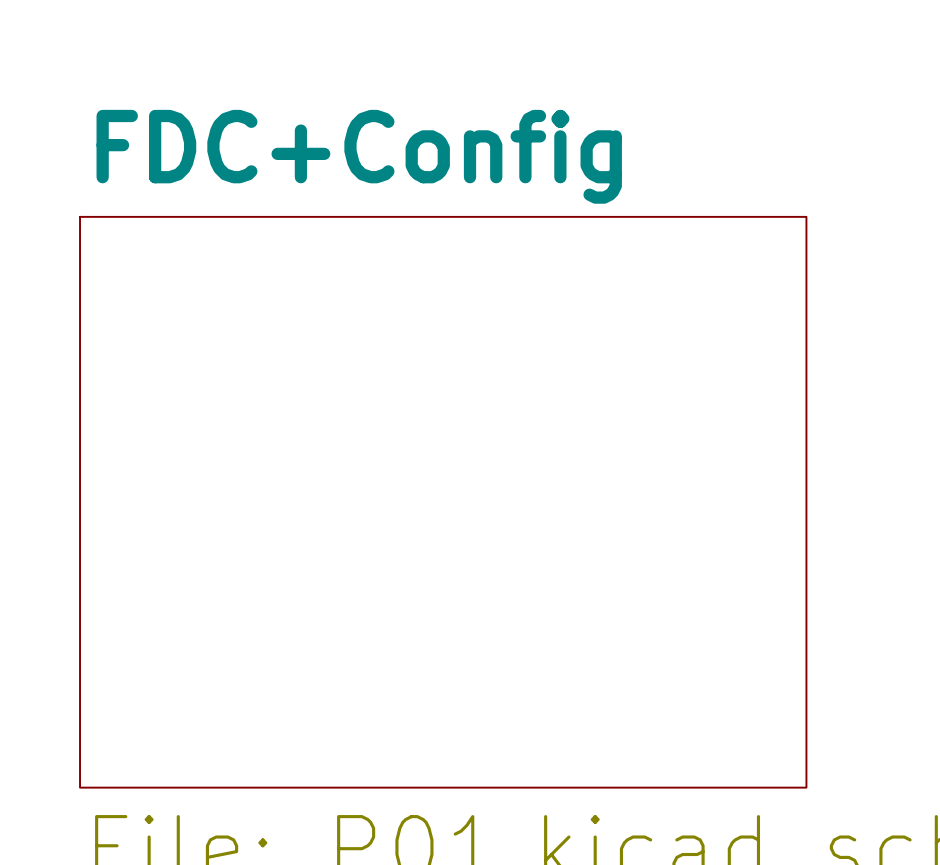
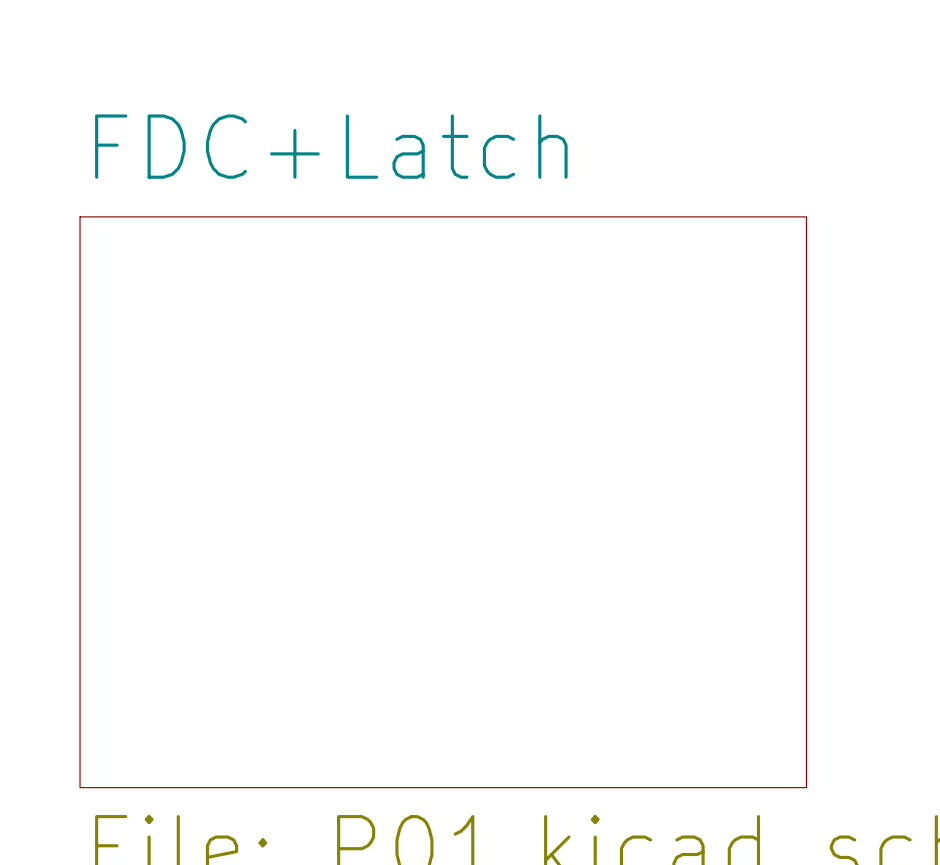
sheet FDC+Config name: FDC+Config (359, 156) -> FDC+Latch (331, 146)

